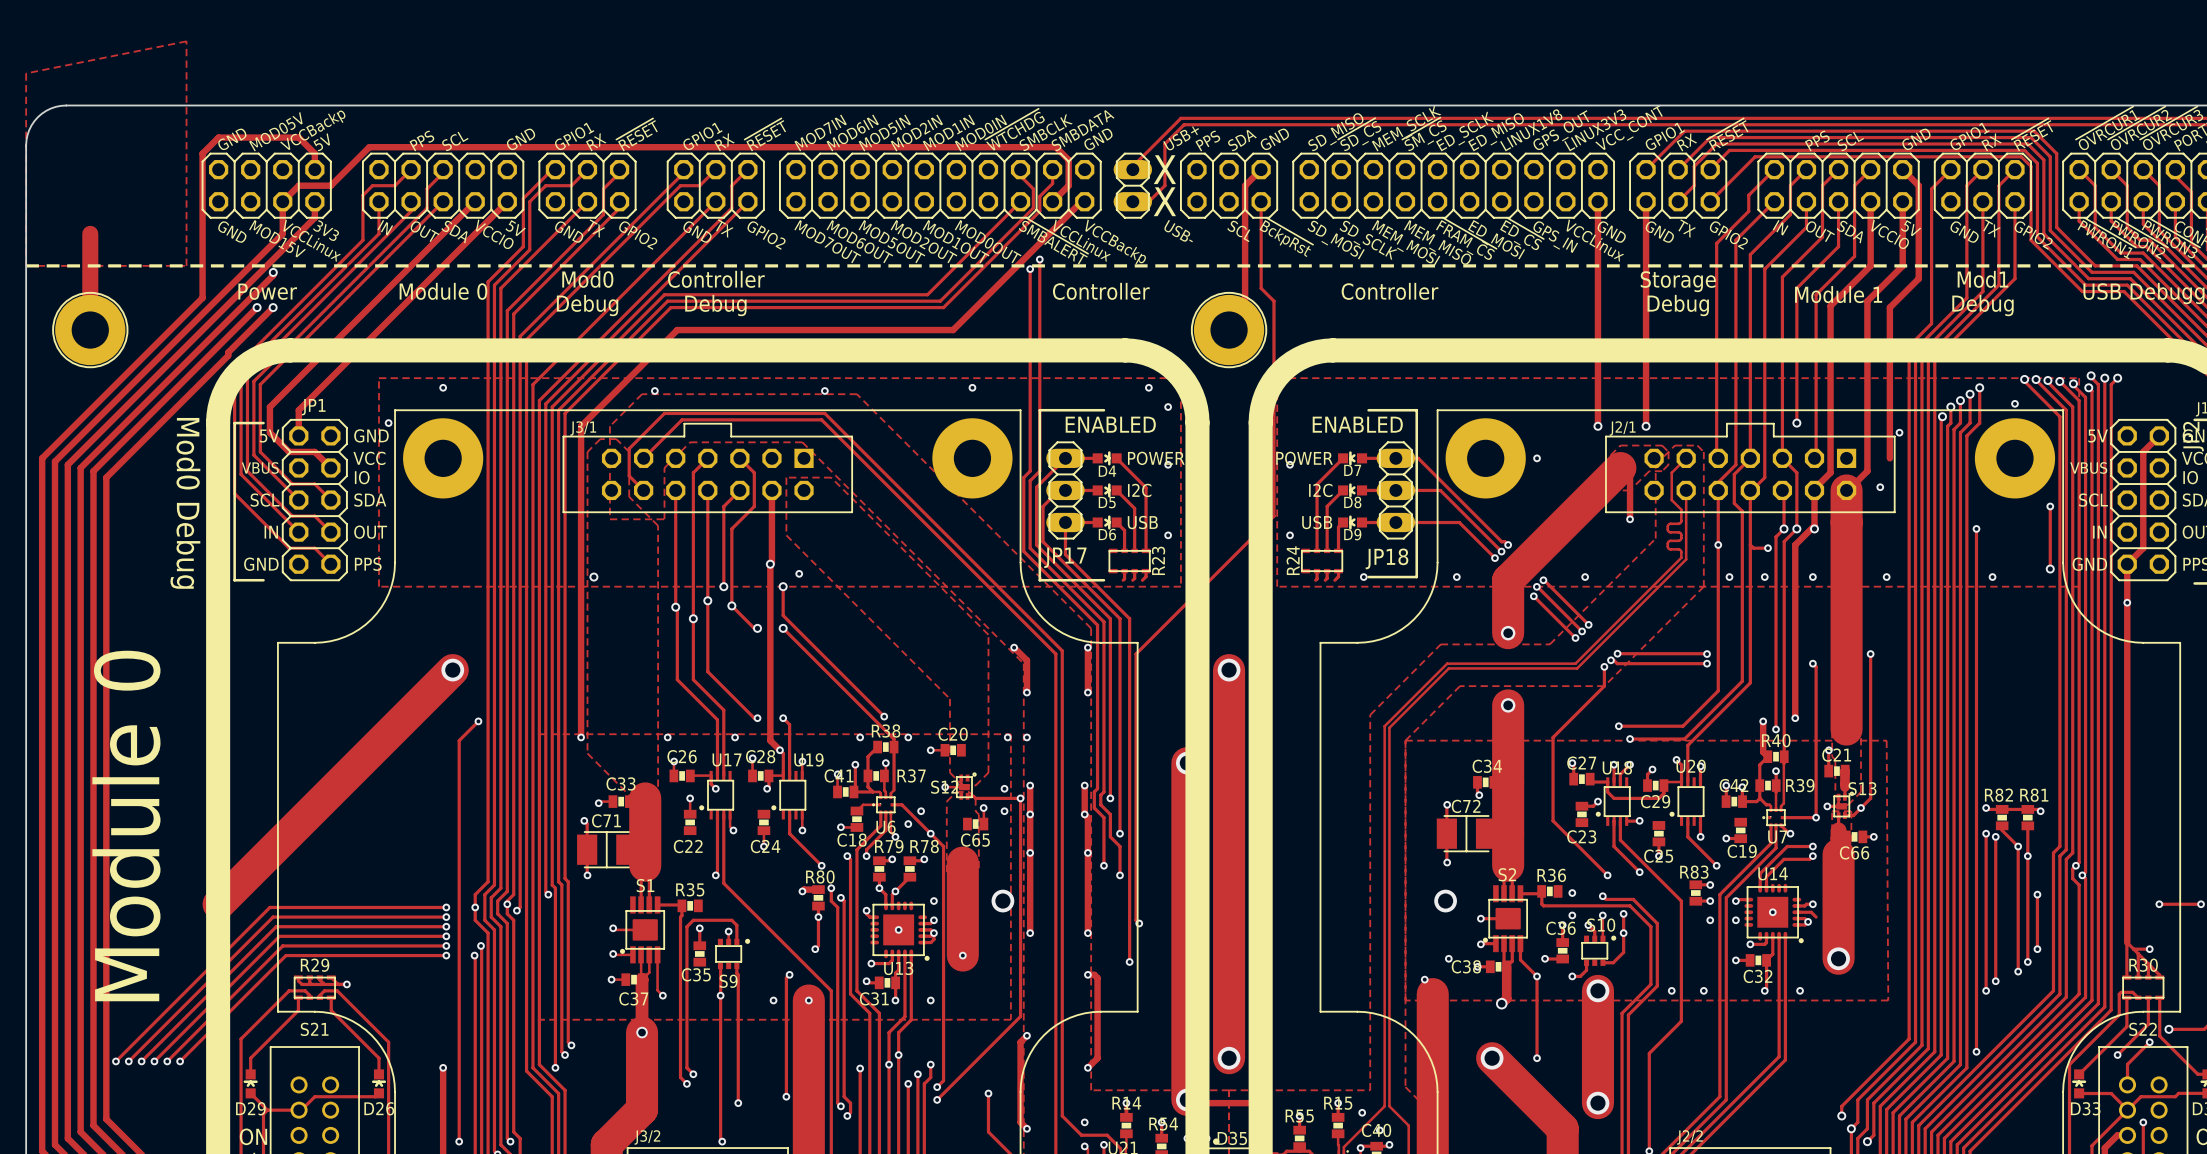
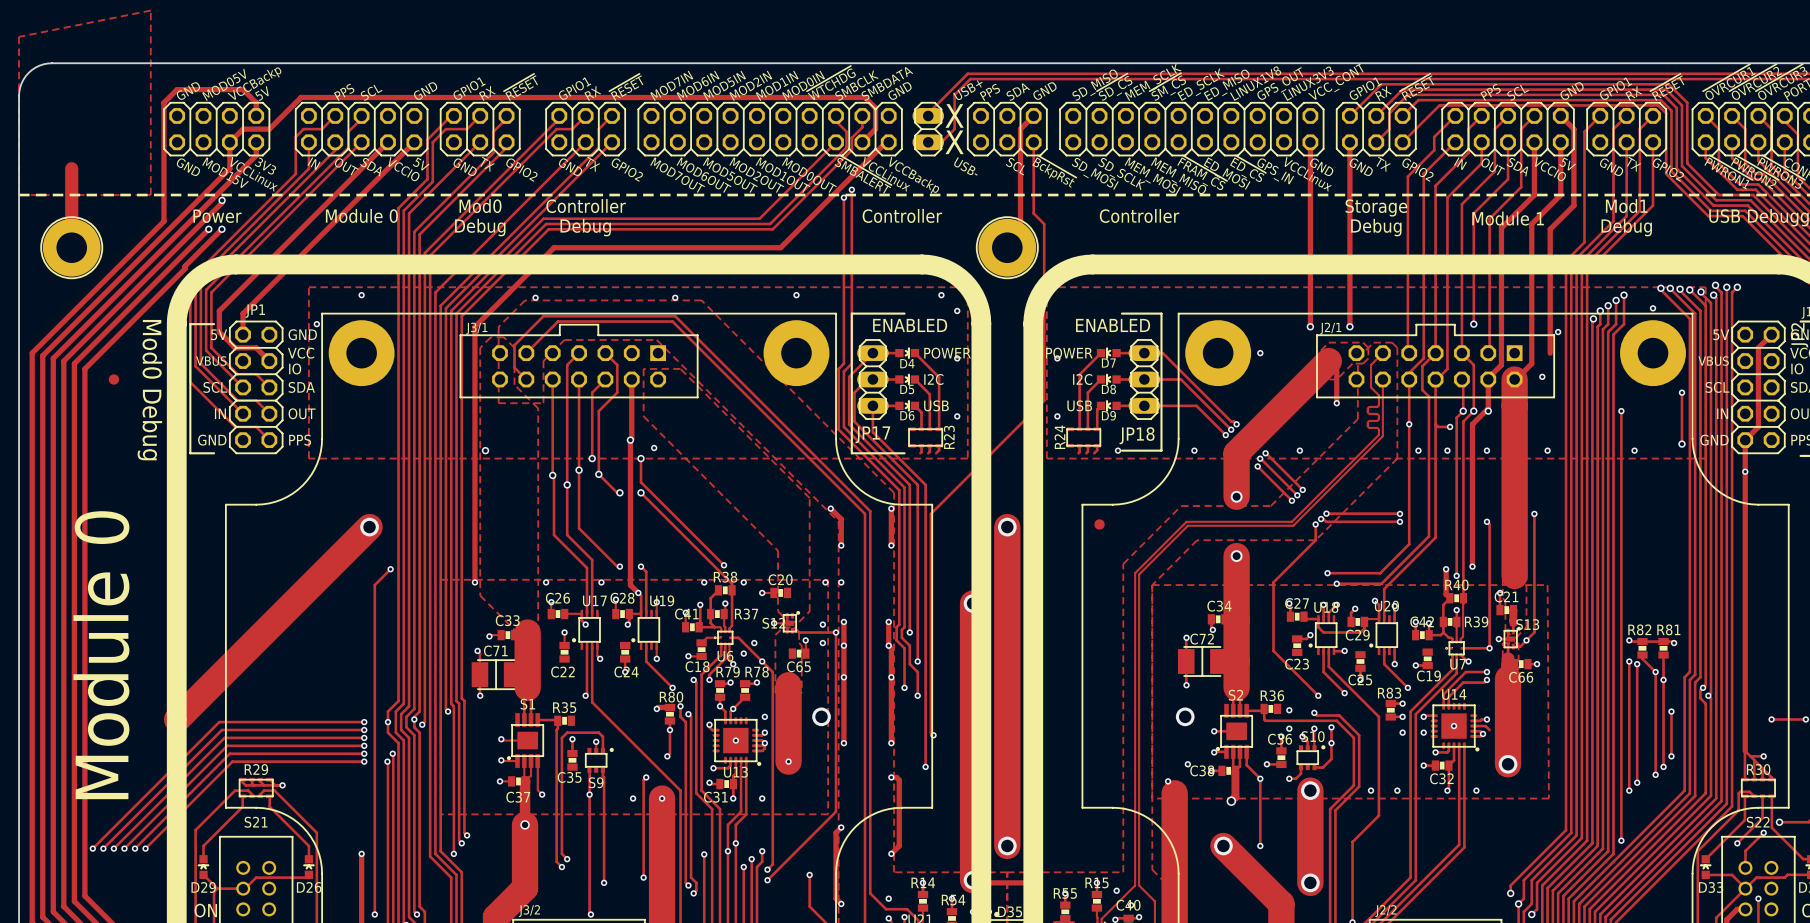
part: none -> (113, 379)
part: none -> (1099, 524)

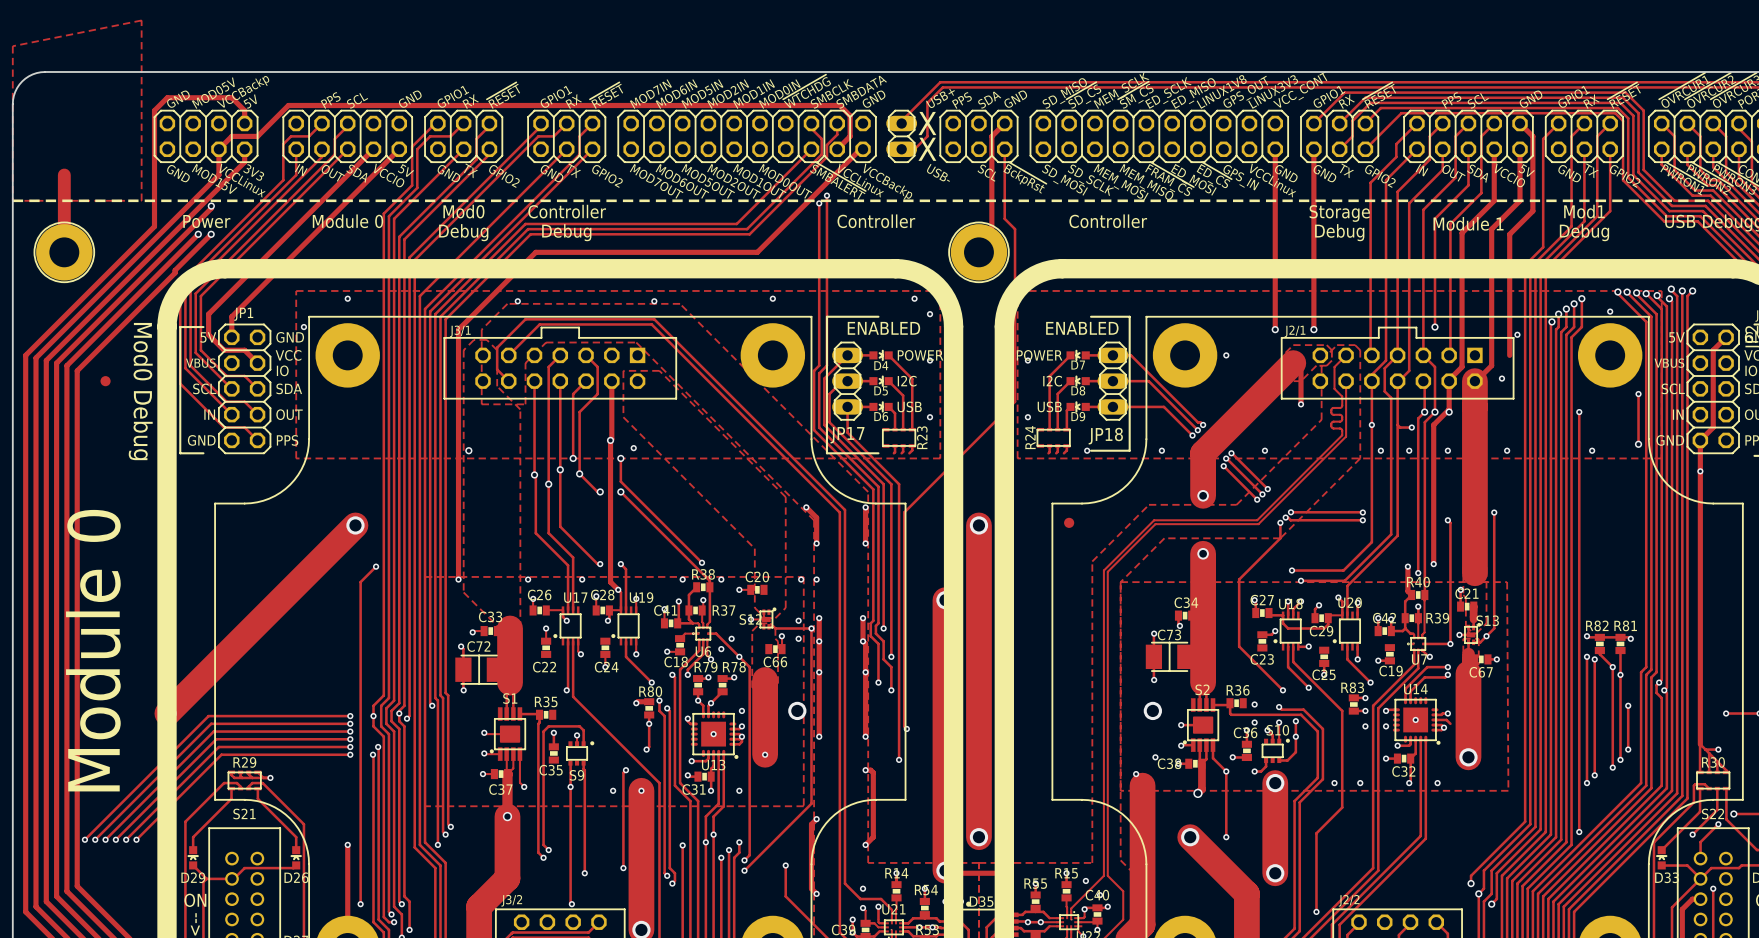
C72 name: C72 (1202, 639) -> C73 (1169, 634)
C71 name: C71 (495, 650) -> C72 (478, 646)
C65 name: C65 (798, 666) -> C66 (775, 661)
C66 name: C66 (1521, 677) -> C67 (1481, 672)

